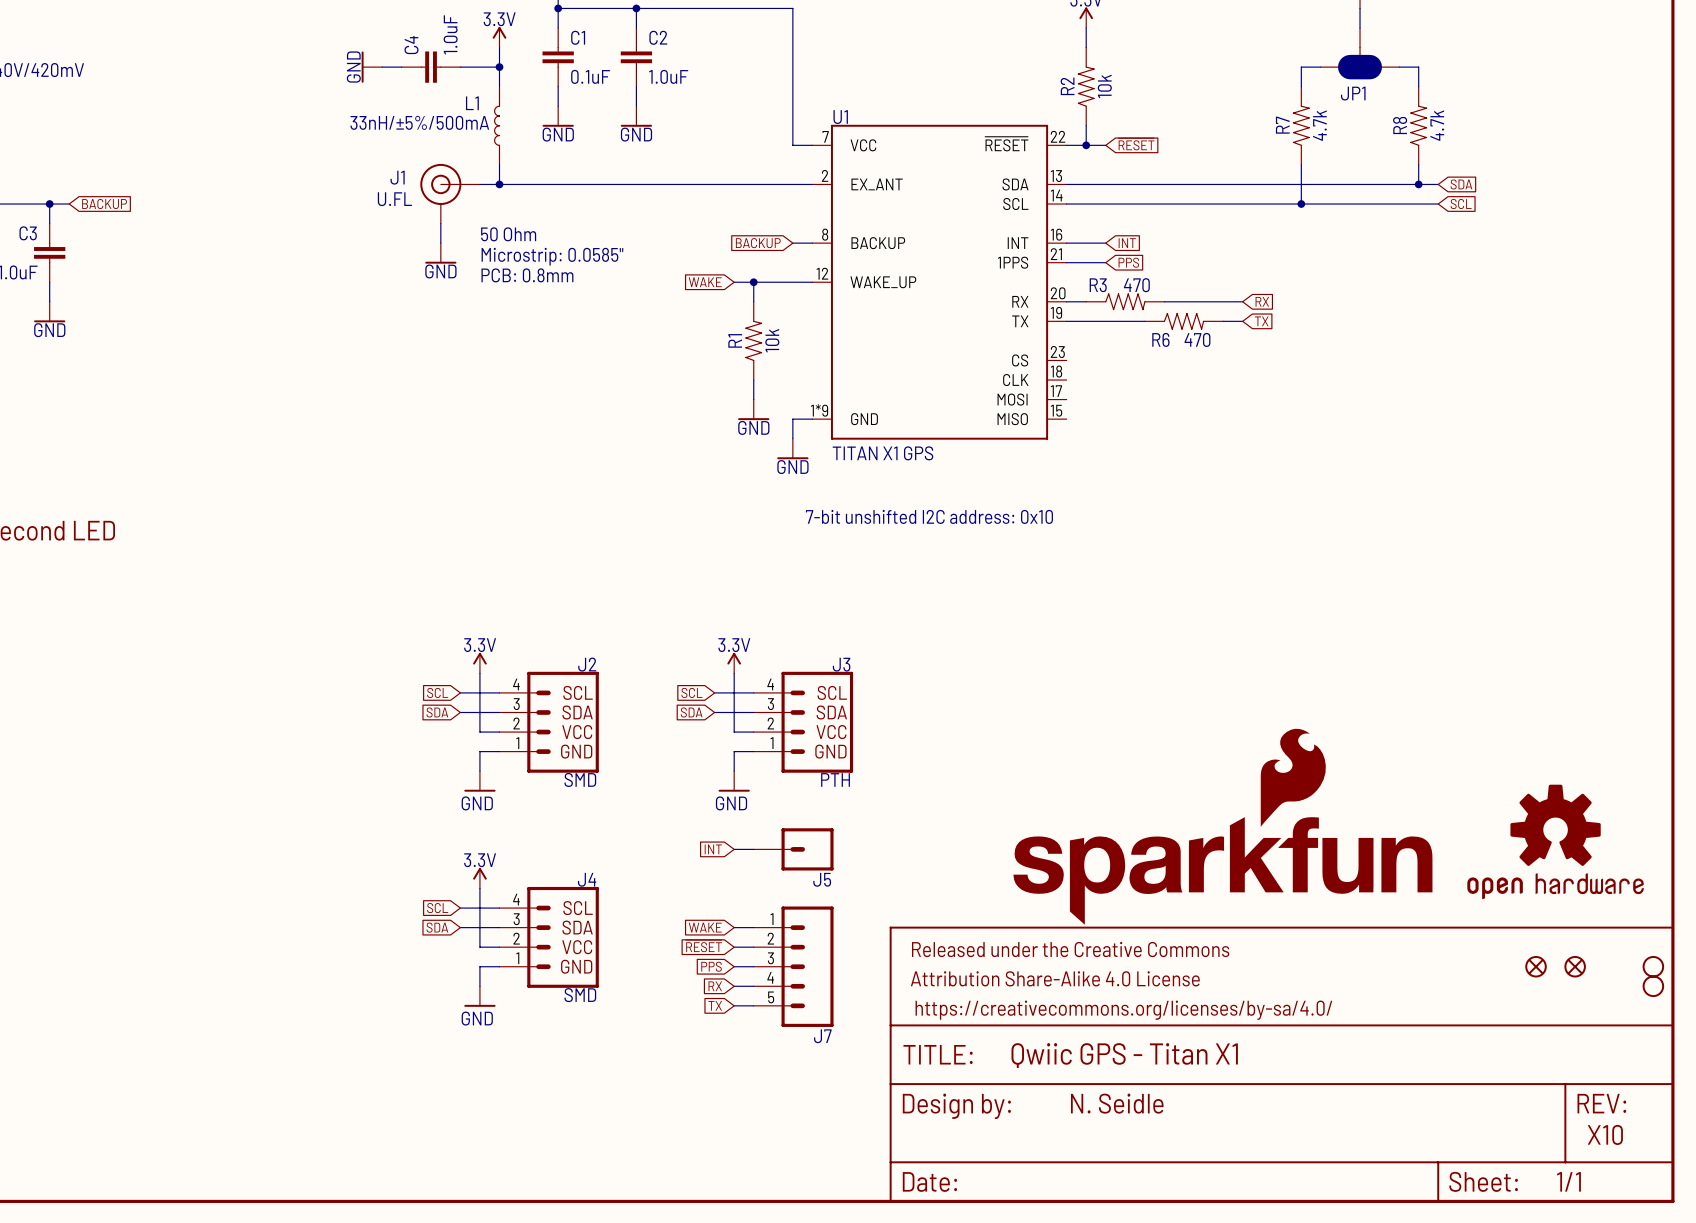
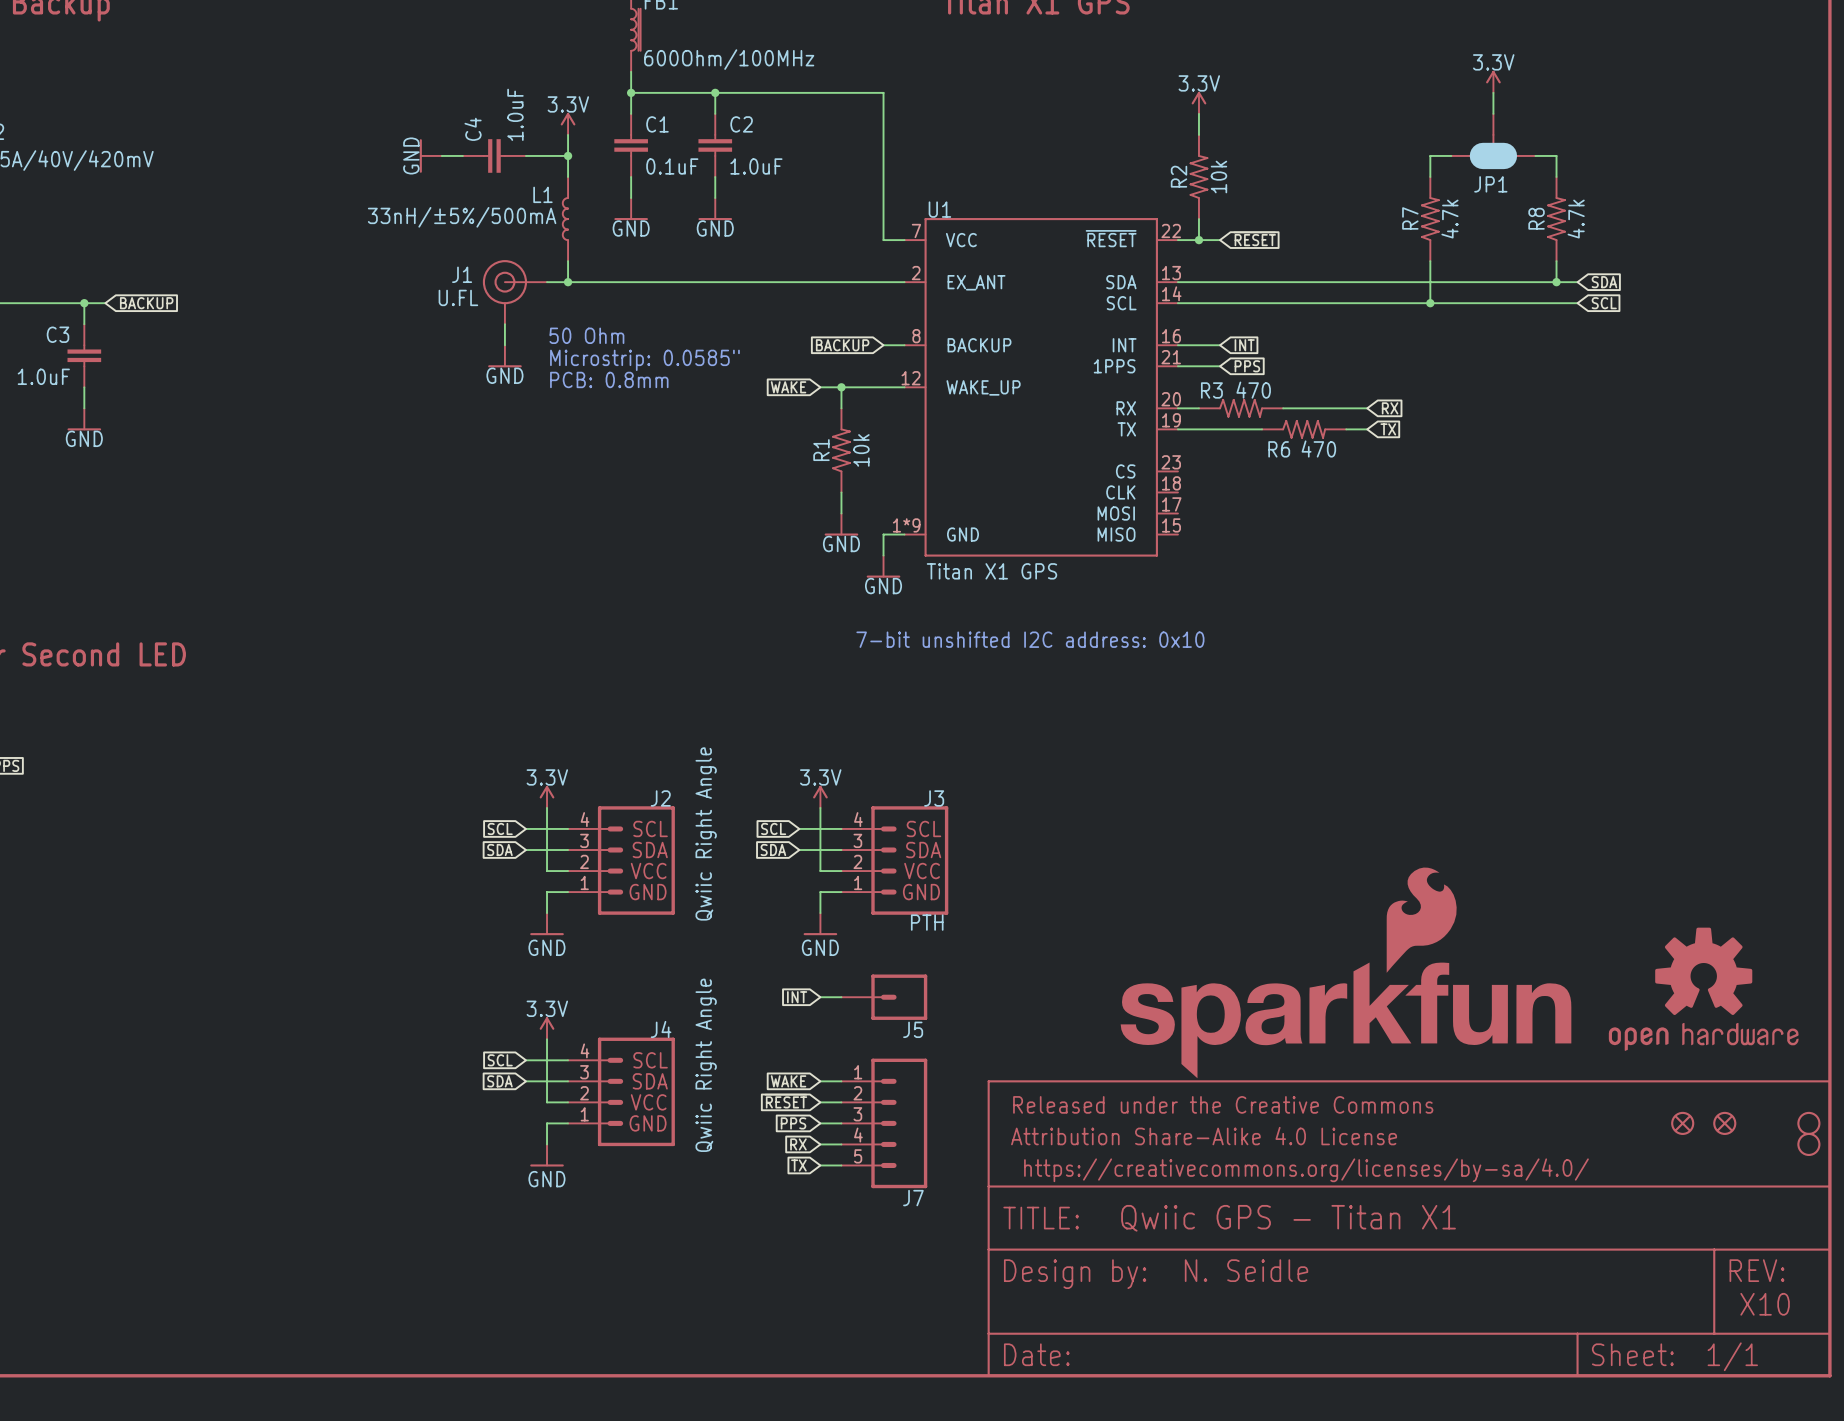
U1 value: TITAN X1 GPS (882, 453) -> Titan X1 GPS (991, 571)
J2 value: SMD (580, 779) -> Qwiic Right Angle (706, 833)
J4 value: SMD (580, 995) -> Qwiic Right Angle (706, 1065)

